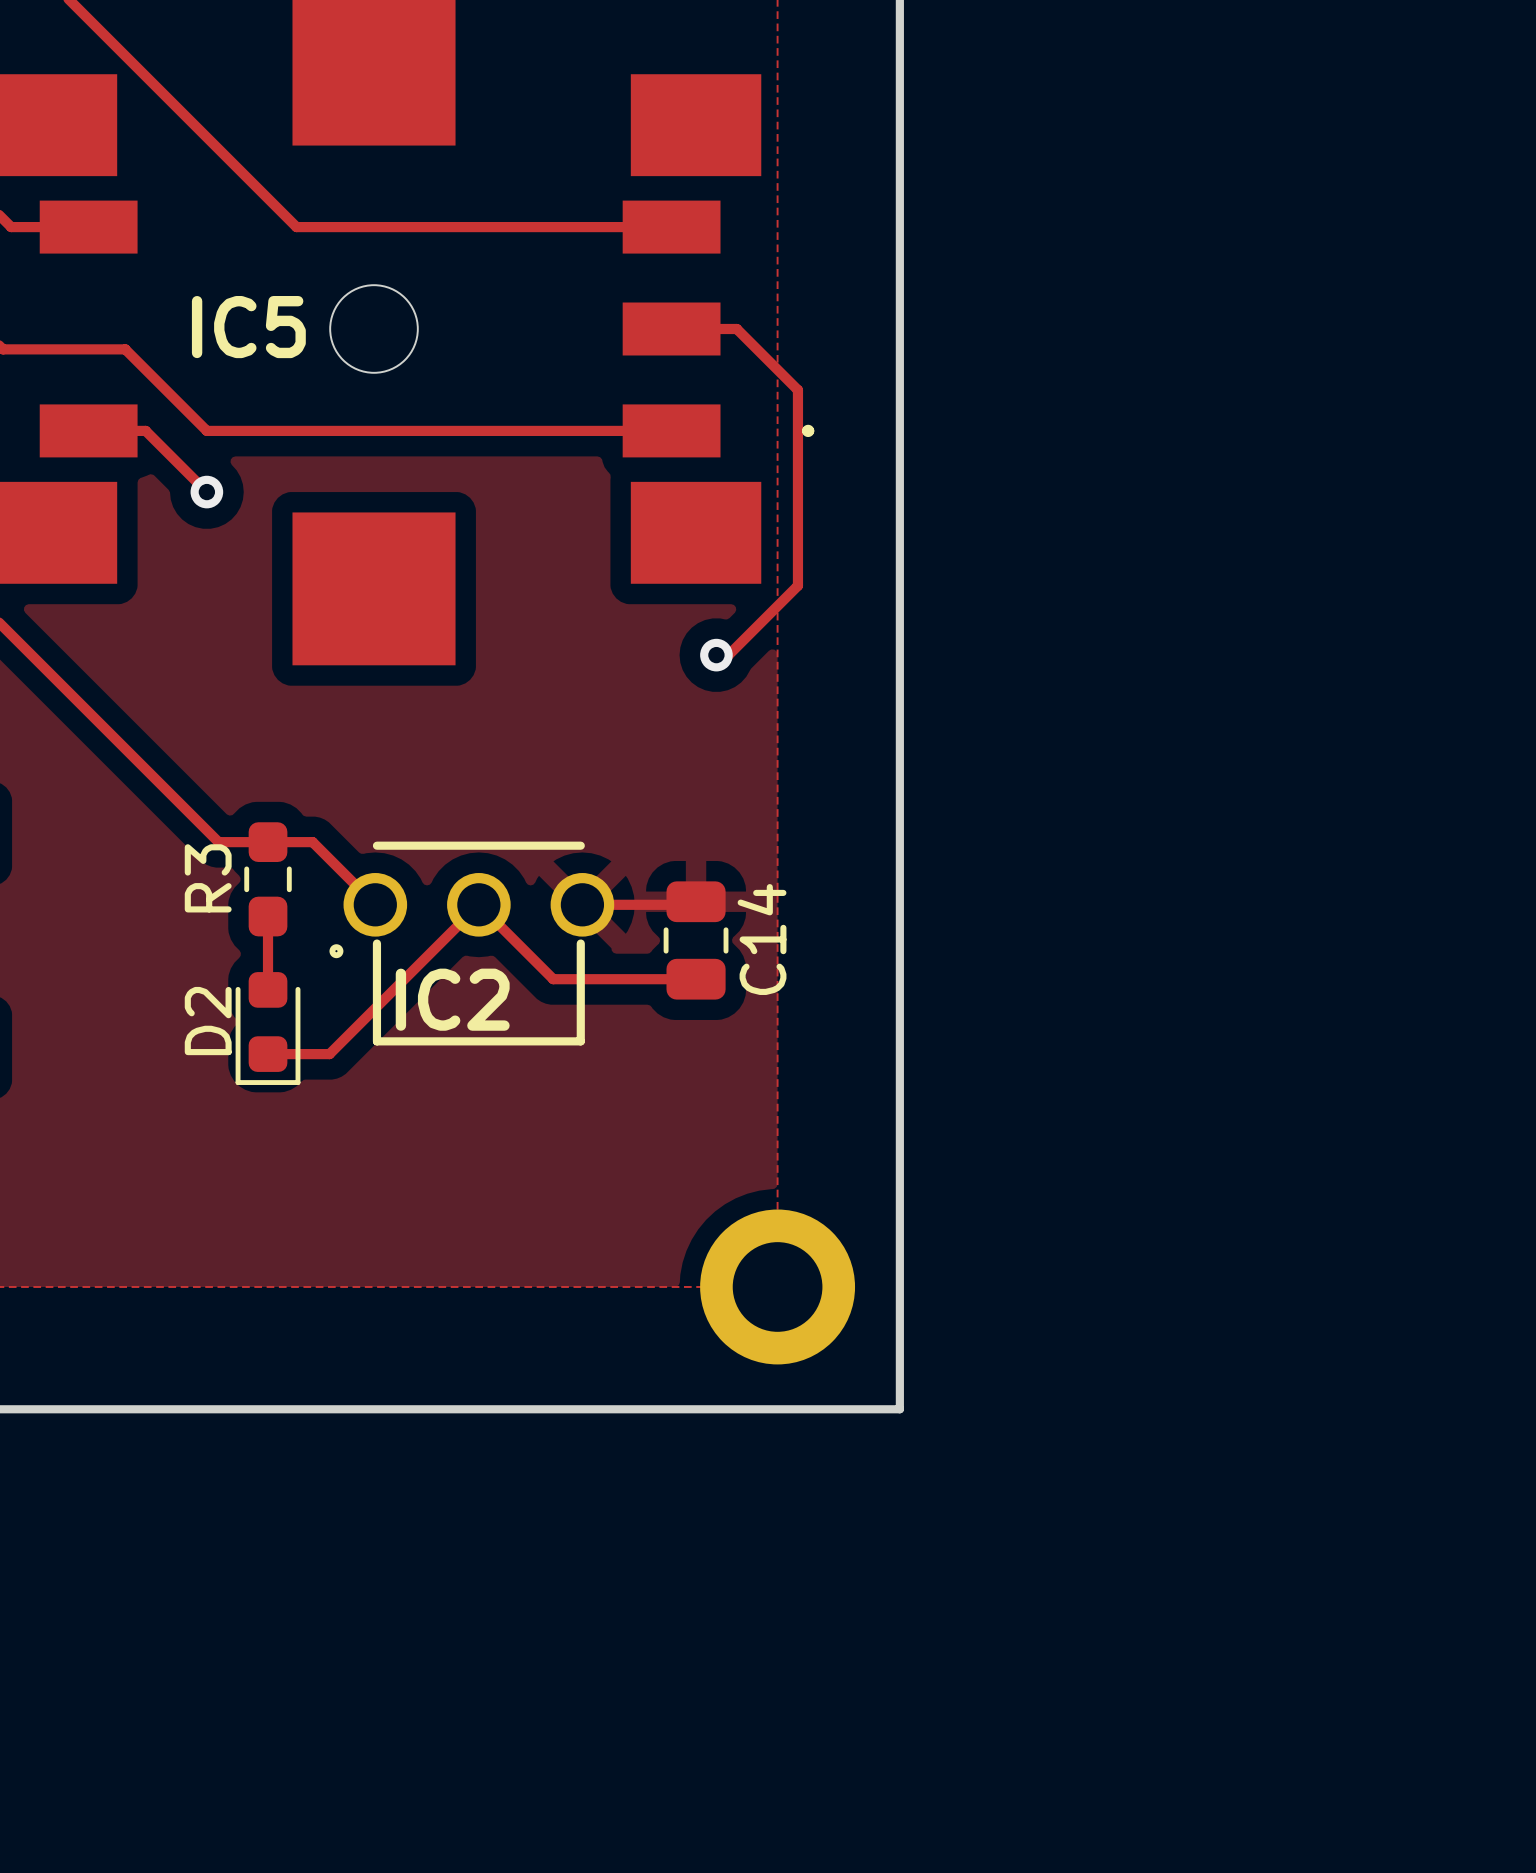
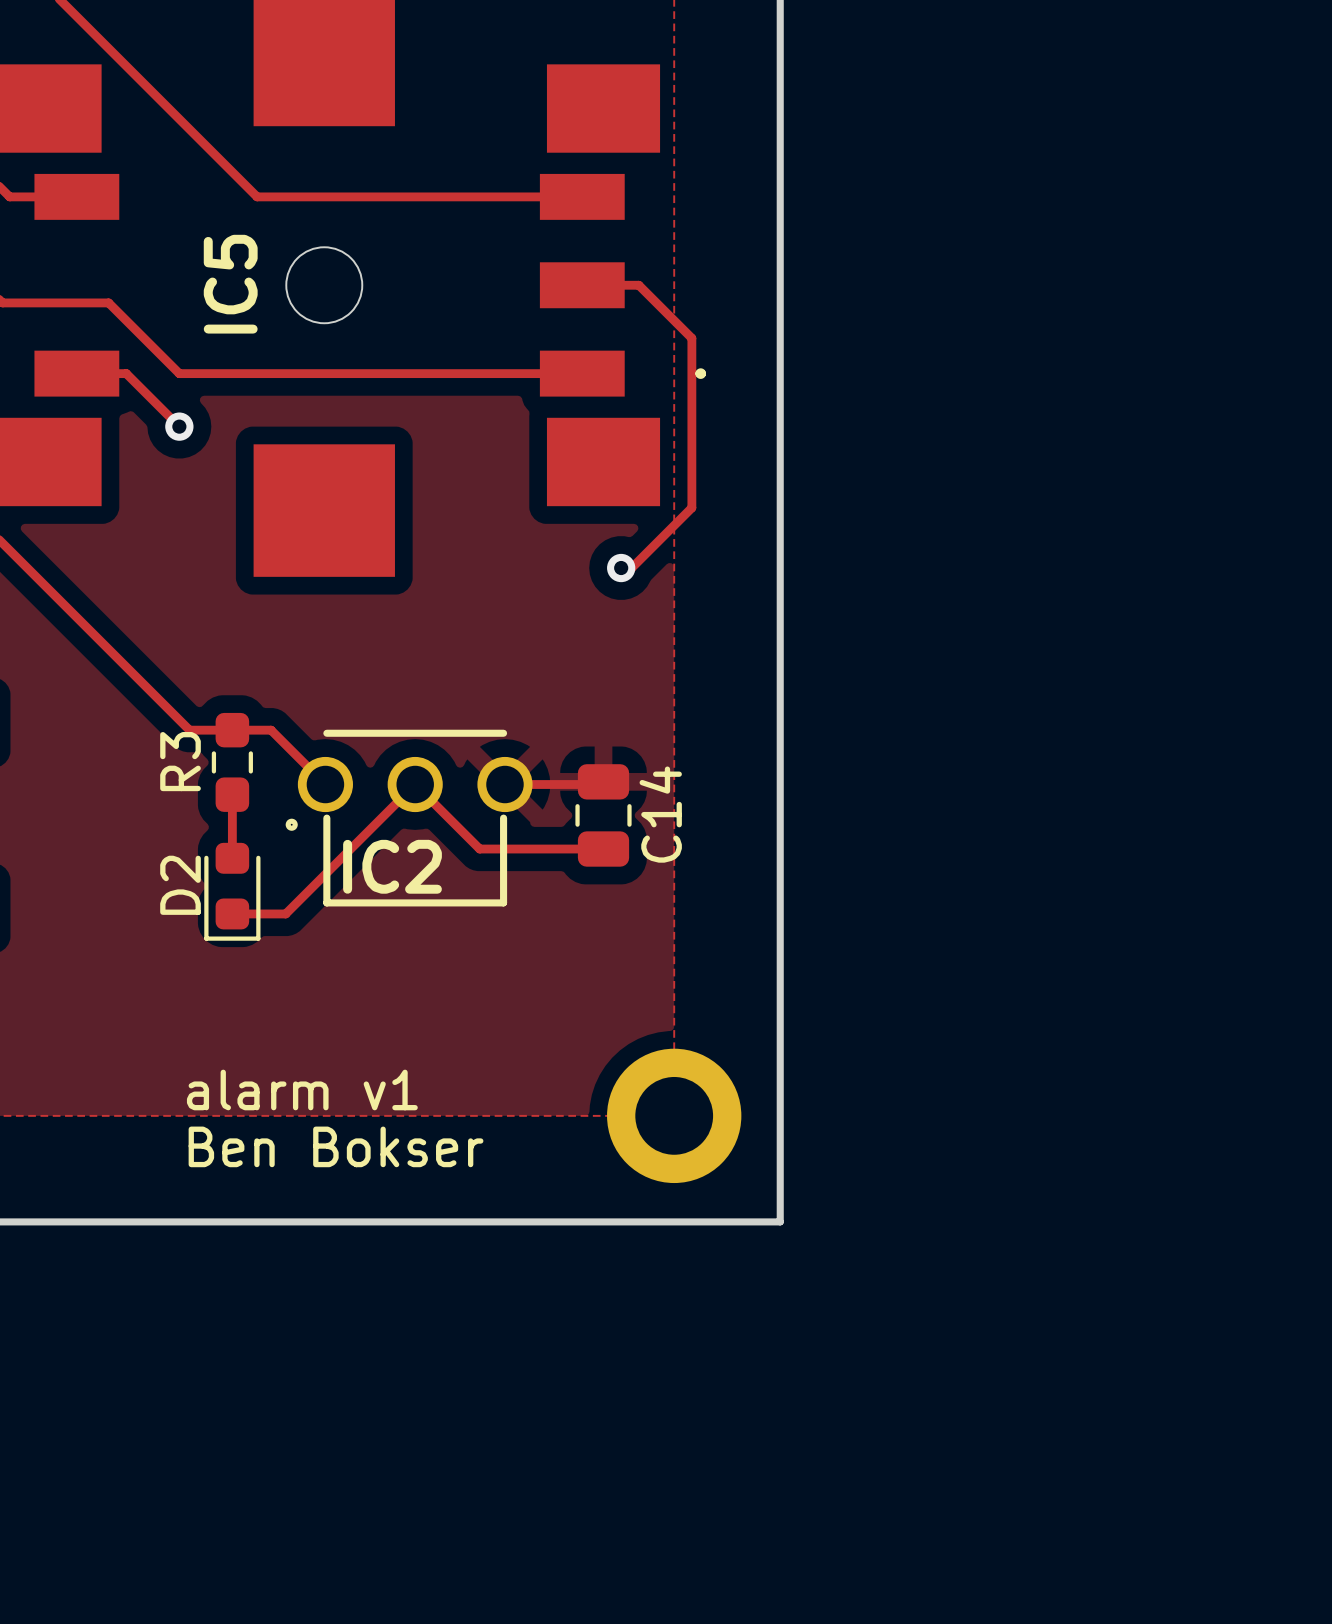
IC5 name rotation: 0° (248, 327) -> 90° counterclockwise (230, 284)
text: none -> alarm v1 (302, 1089)
text: none -> Ben Bokser (336, 1146)

